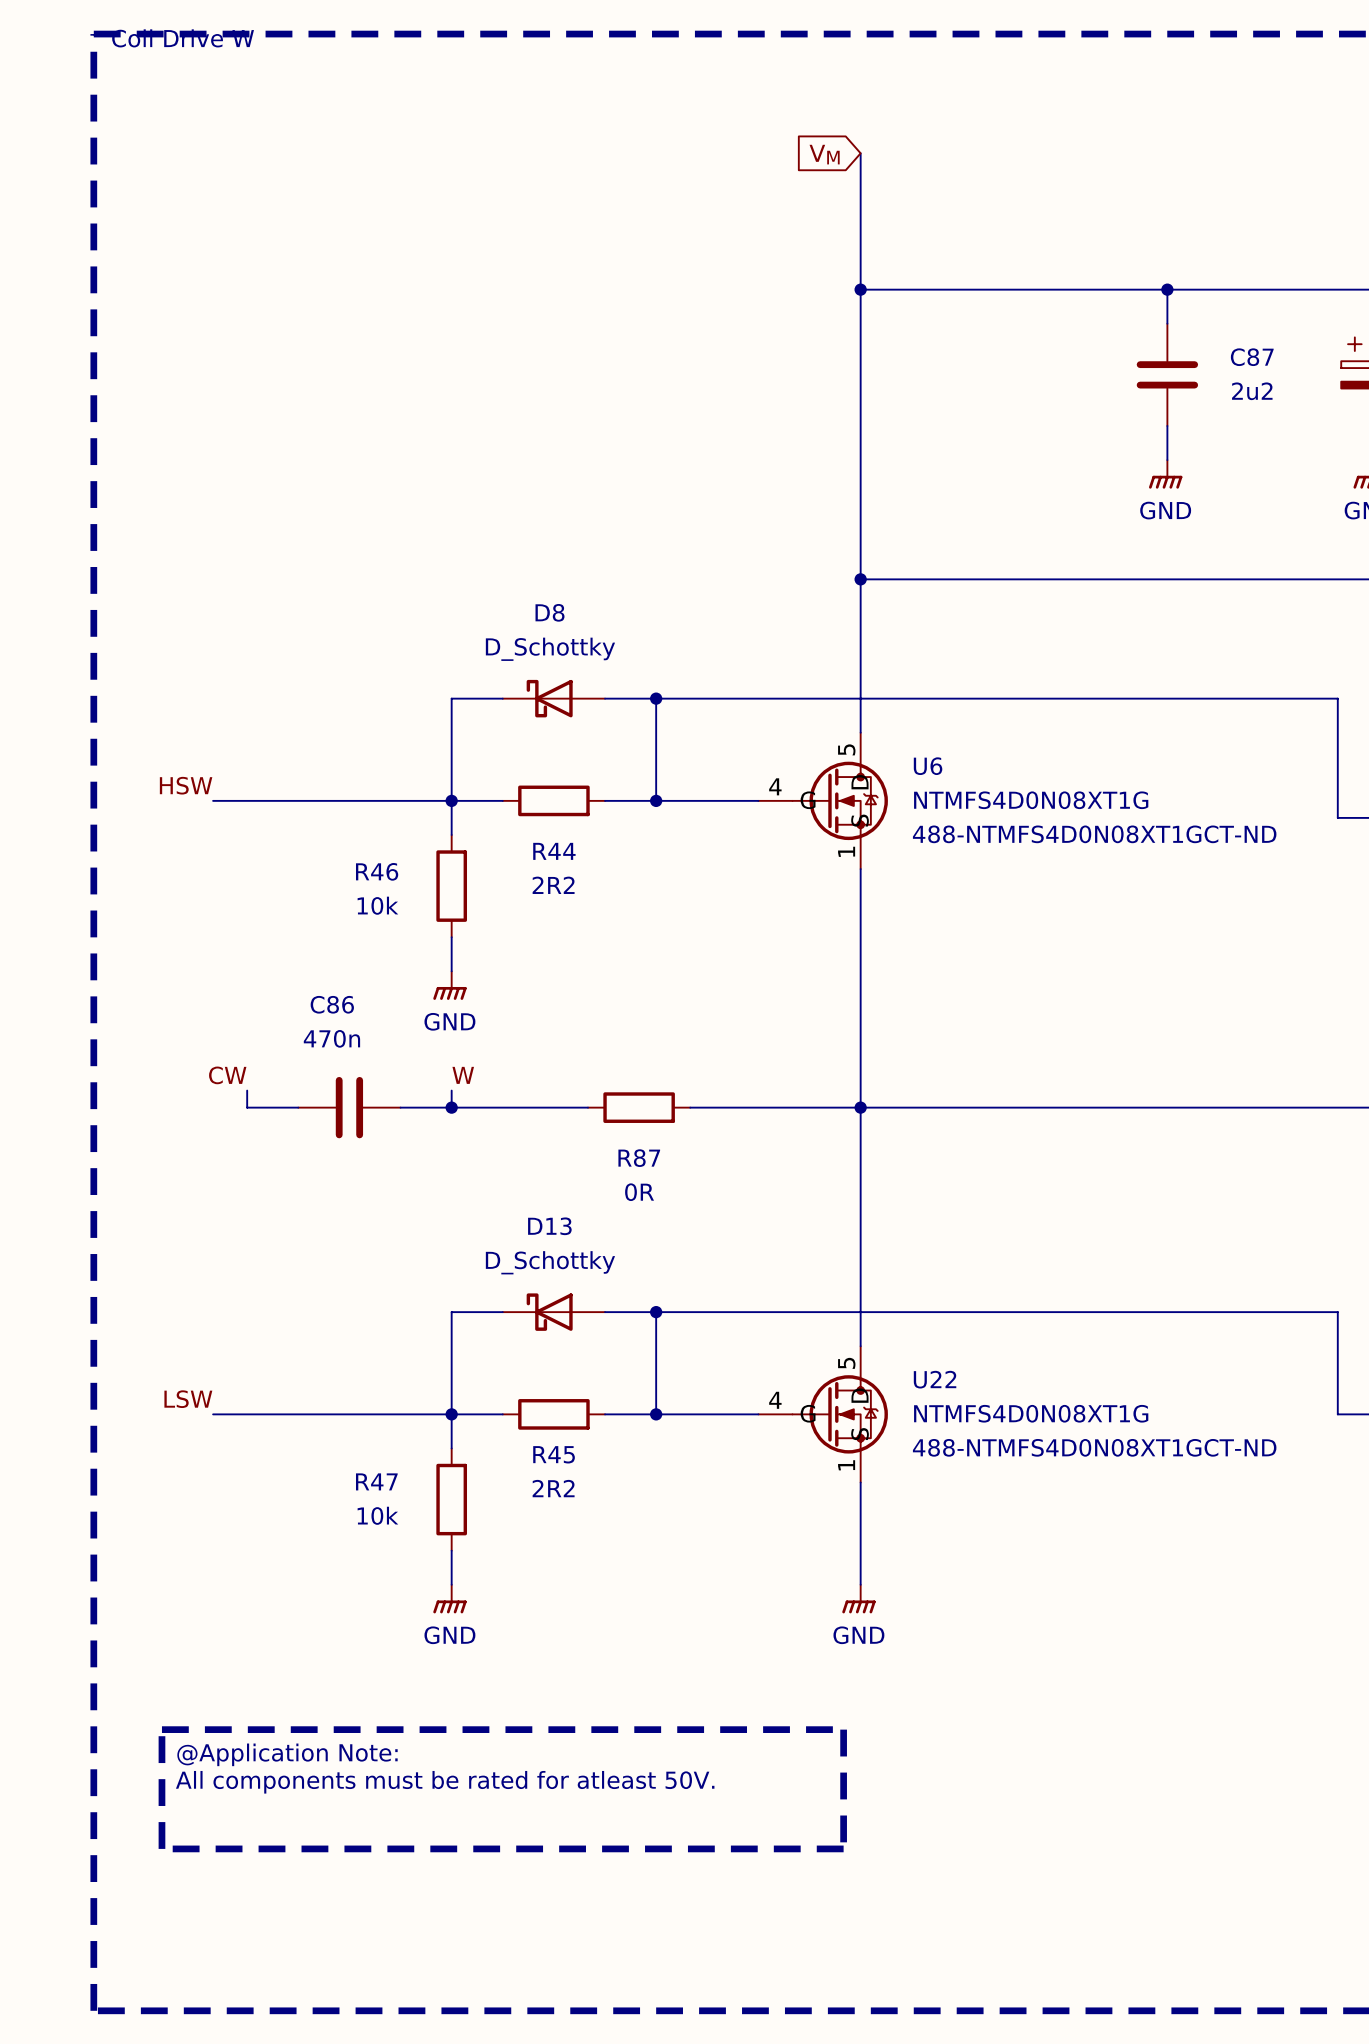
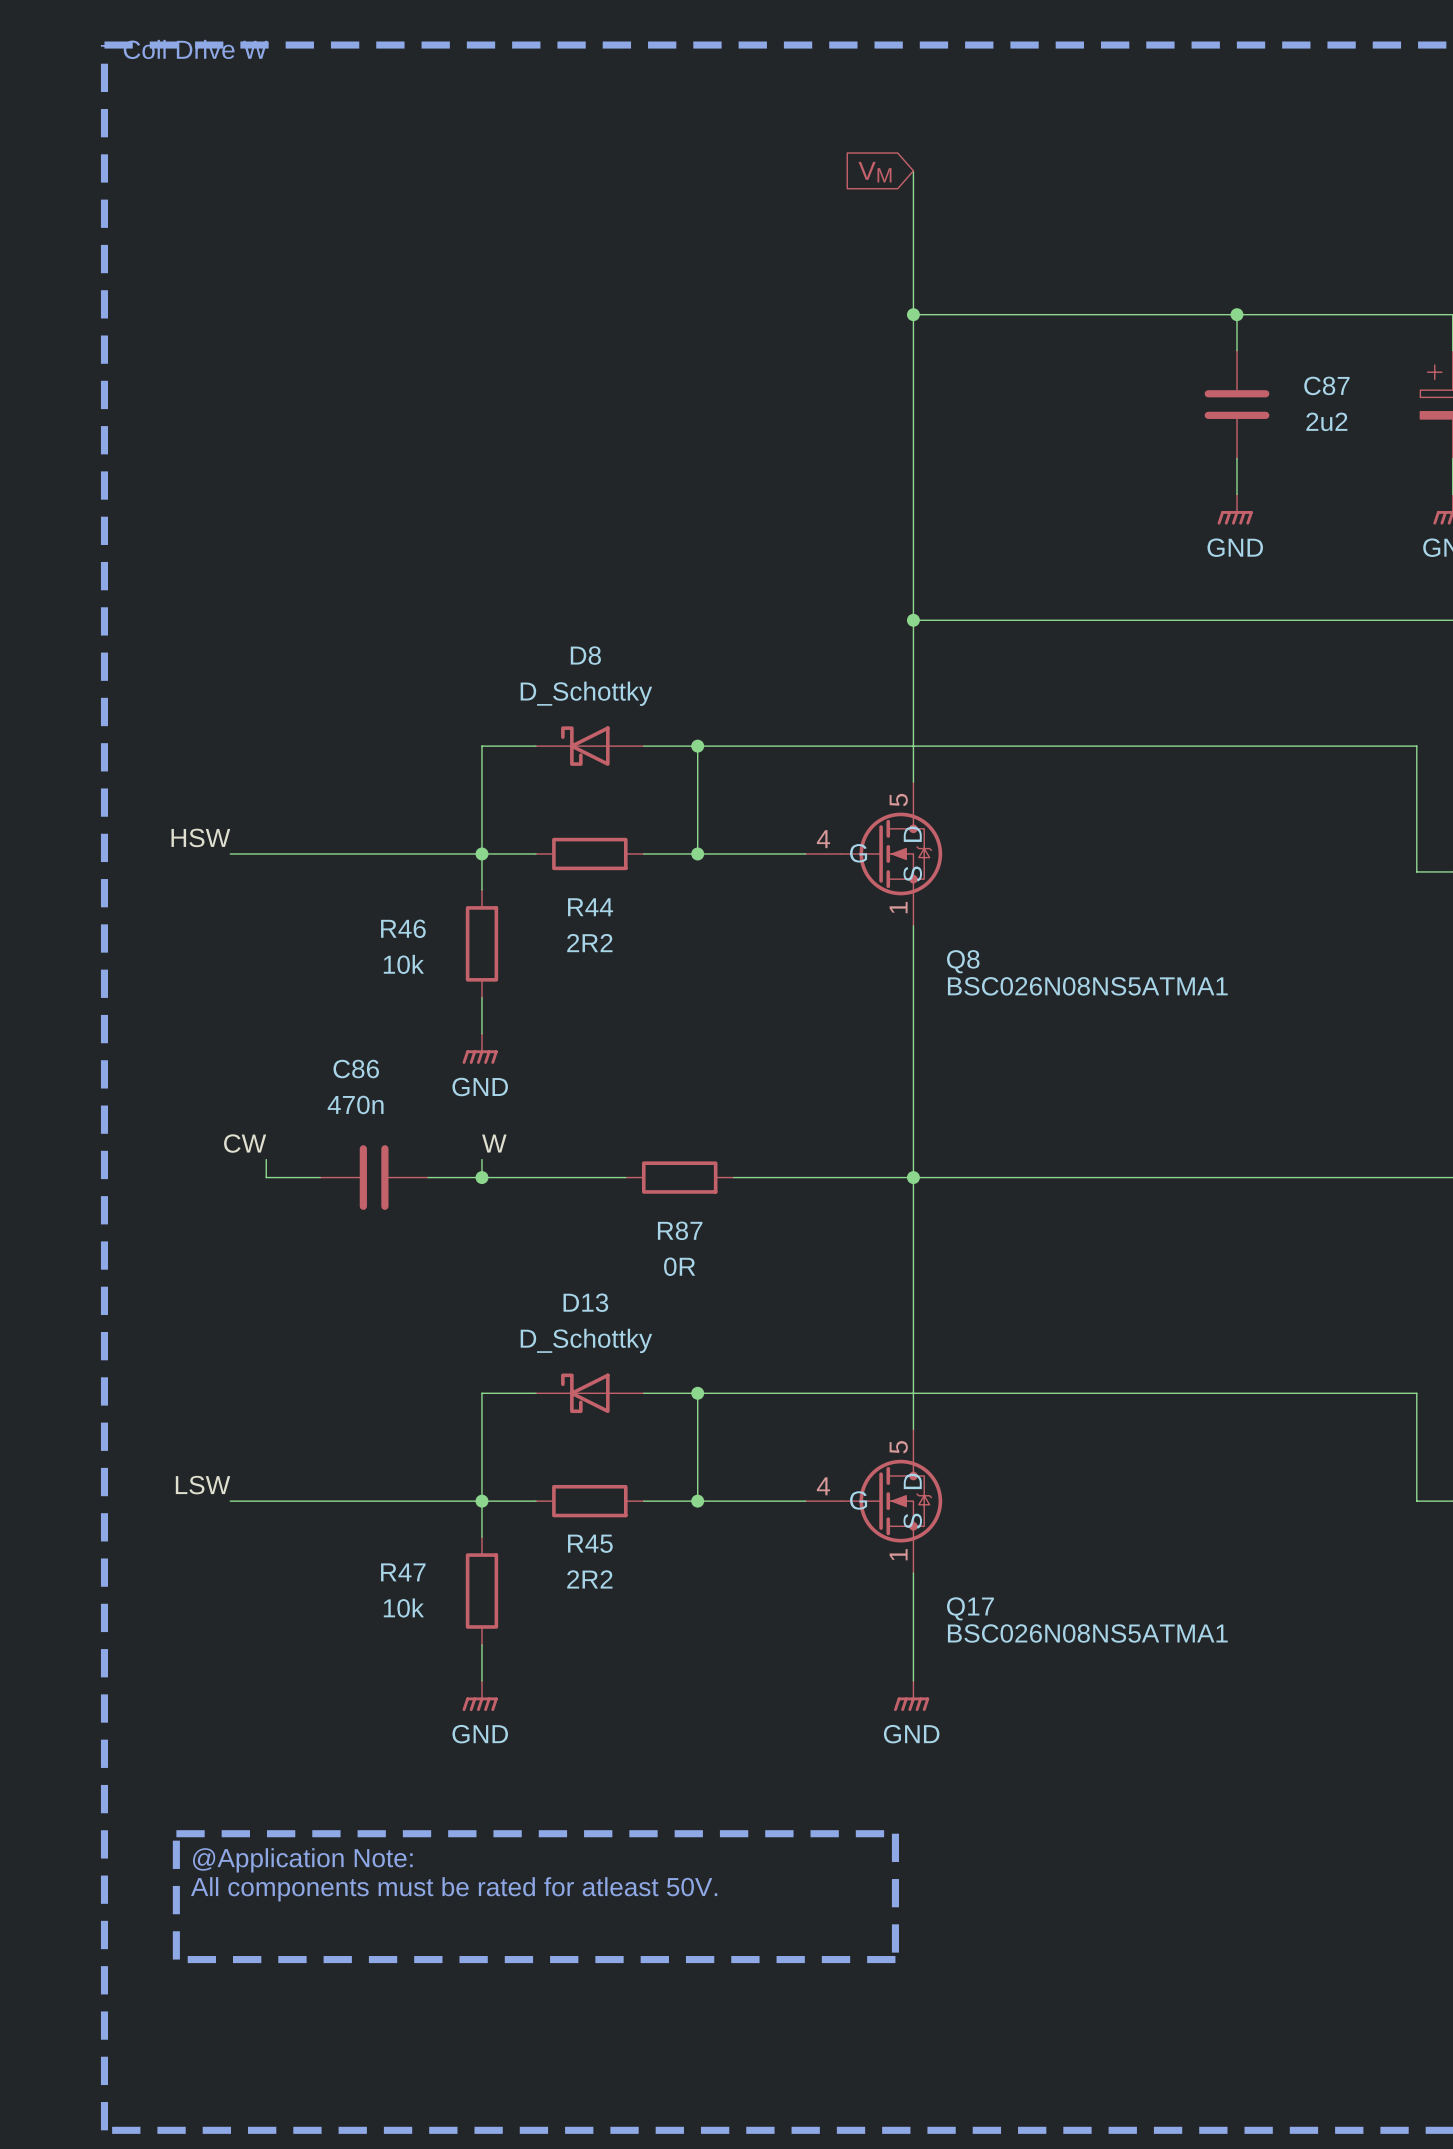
U6 name: U6 (928, 766) -> Q8 (963, 961)
U6 value: NTMFS4D0N08XT1G (1031, 800) -> BSC026N08NS5ATMA1 (1087, 986)
U6 text: 488-NTMFS4D0N08XT1GCT-ND (1094, 834) -> none
U22 name: U22 (935, 1379) -> Q17 (970, 1608)
U22 value: NTMFS4D0N08XT1G (1031, 1413) -> BSC026N08NS5ATMA1 (1087, 1633)
U22 text: 488-NTMFS4D0N08XT1GCT-ND (1094, 1447) -> none

